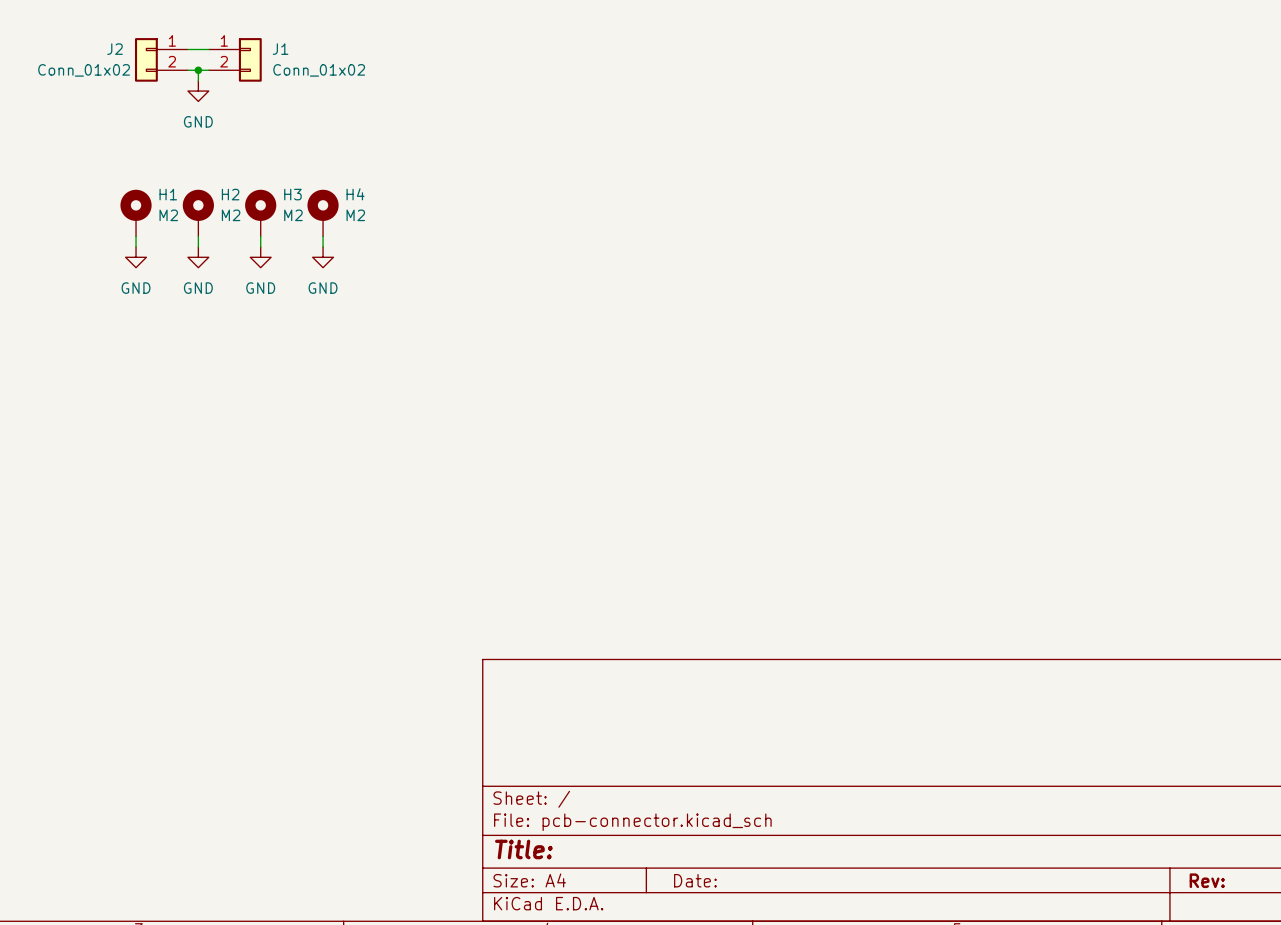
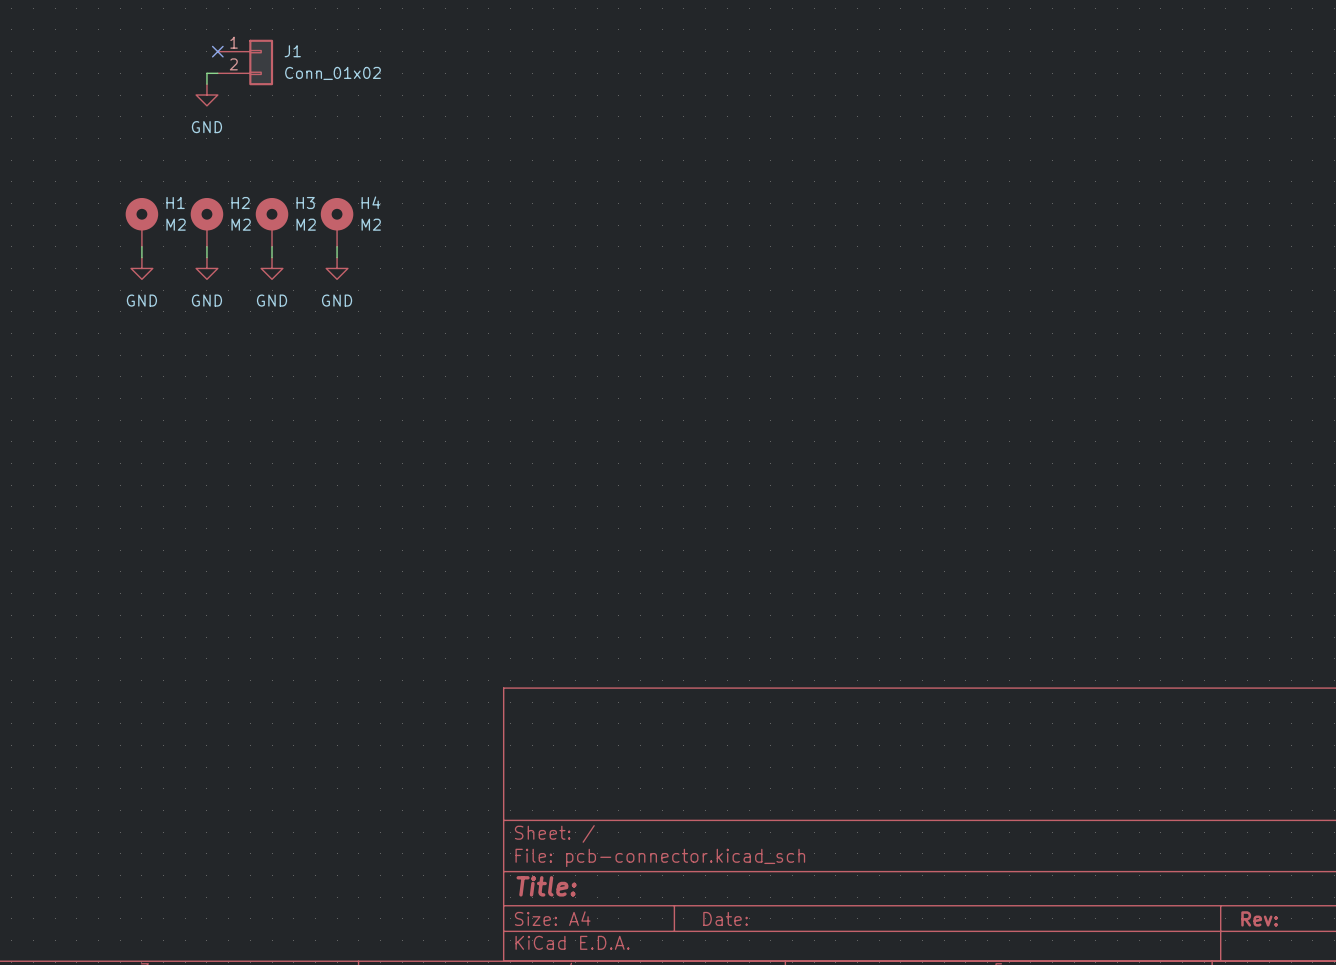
wire: (187, 49) (208, 49) -> none
no-connect mark: none -> (217, 51)
J2: Conn_01x02 (161, 59) -> none
wire: (187, 70) (198, 70) -> none
junction: (198, 70) -> none

